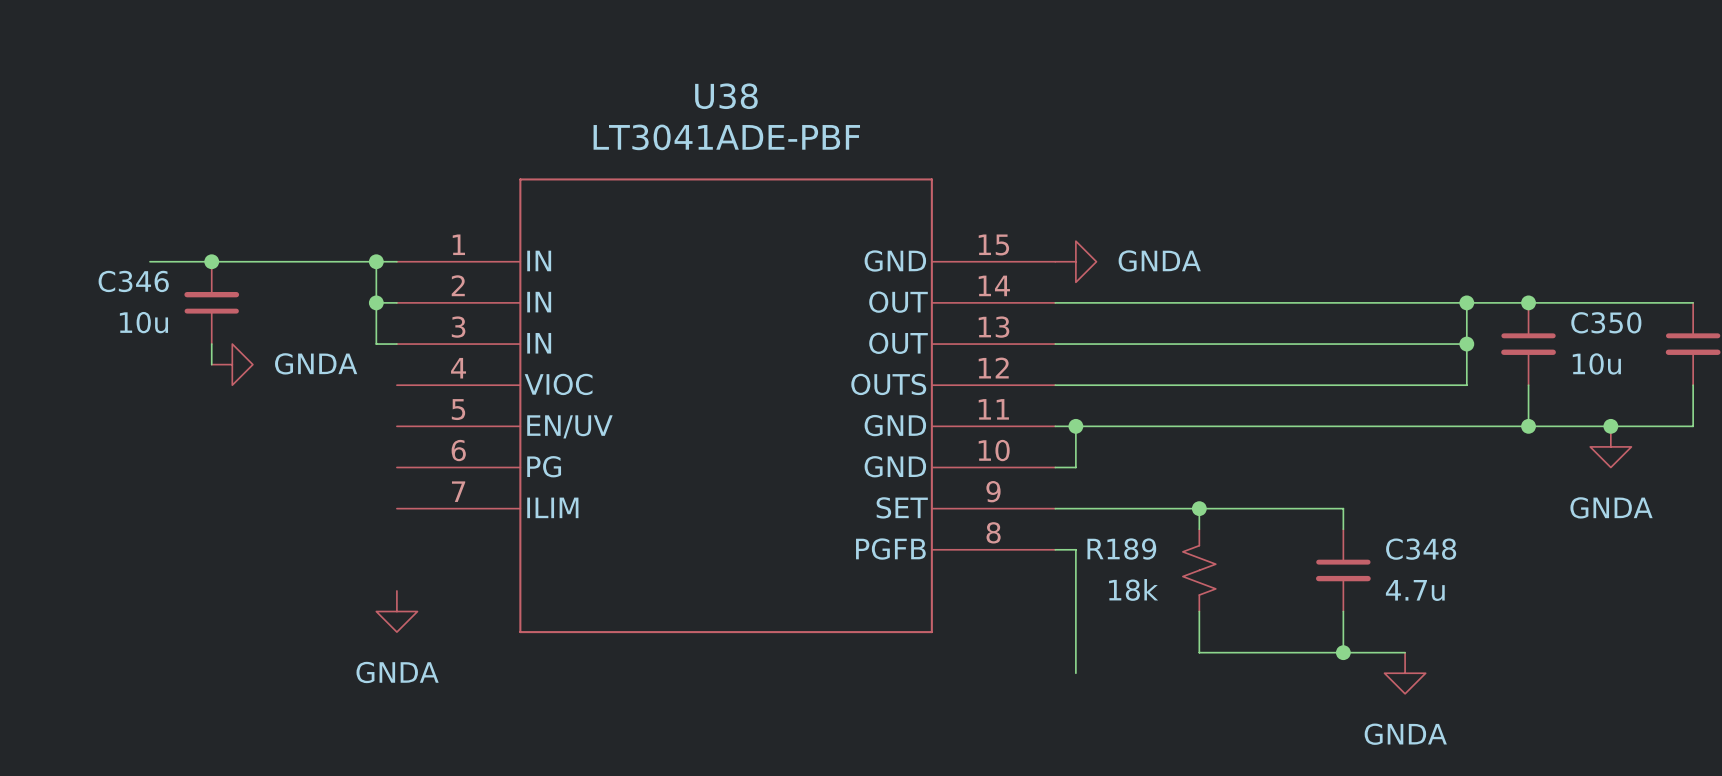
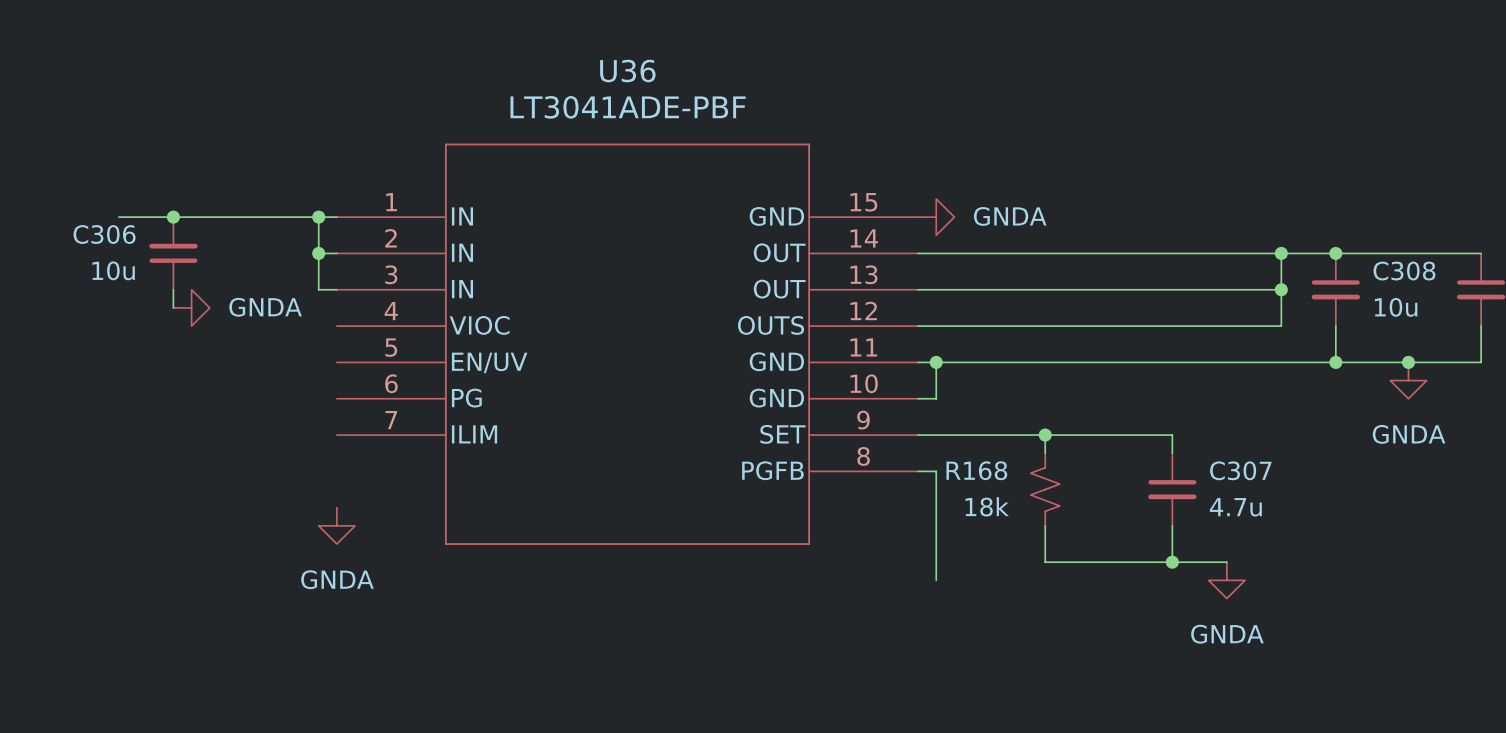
U38 name: U38 (726, 96) -> U36 (627, 71)
C346 name: C346 (133, 281) -> C306 (104, 234)
C350 name: C350 (1606, 322) -> C308 (1404, 271)
R189 name: R189 (1121, 549) -> R168 (976, 470)
C348 name: C348 (1421, 549) -> C307 (1240, 470)

